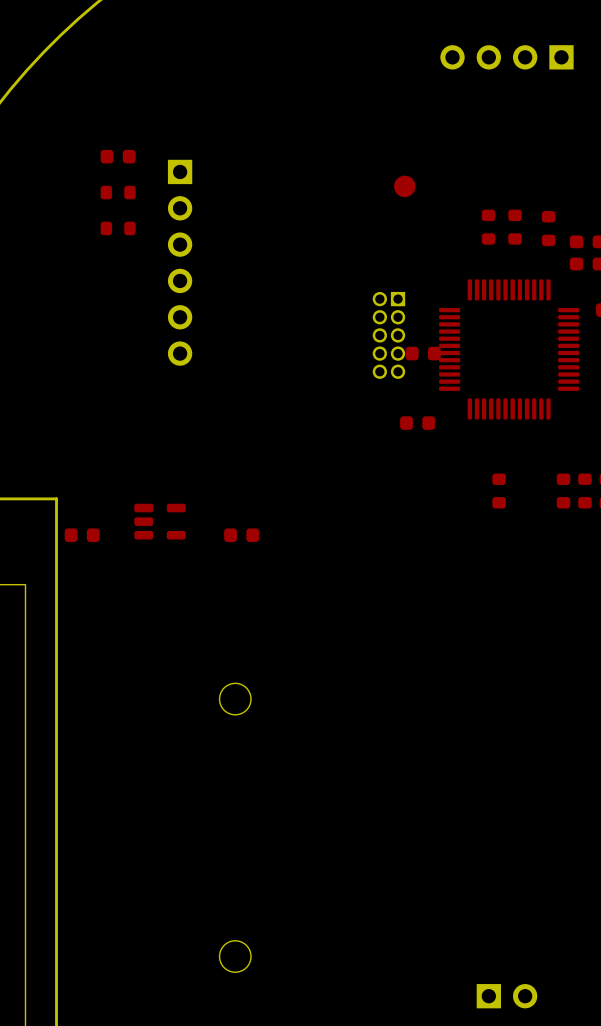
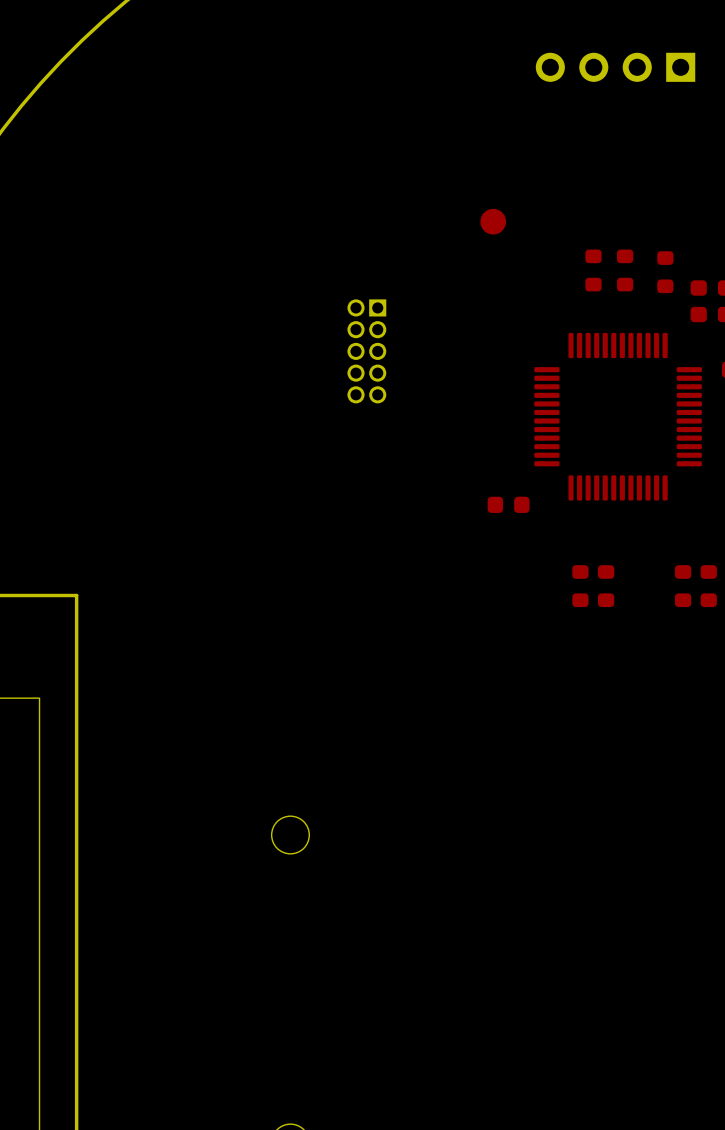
part: (118, 156) -> none
part: (118, 192) -> none
part: (118, 228) -> none
part: (180, 262) -> none
part position: (388, 335) -> (366, 351)
part: (423, 353) -> none
part: none -> (580, 586)
part: (160, 521) -> none
part: (82, 535) -> none
part: (241, 535) -> none

